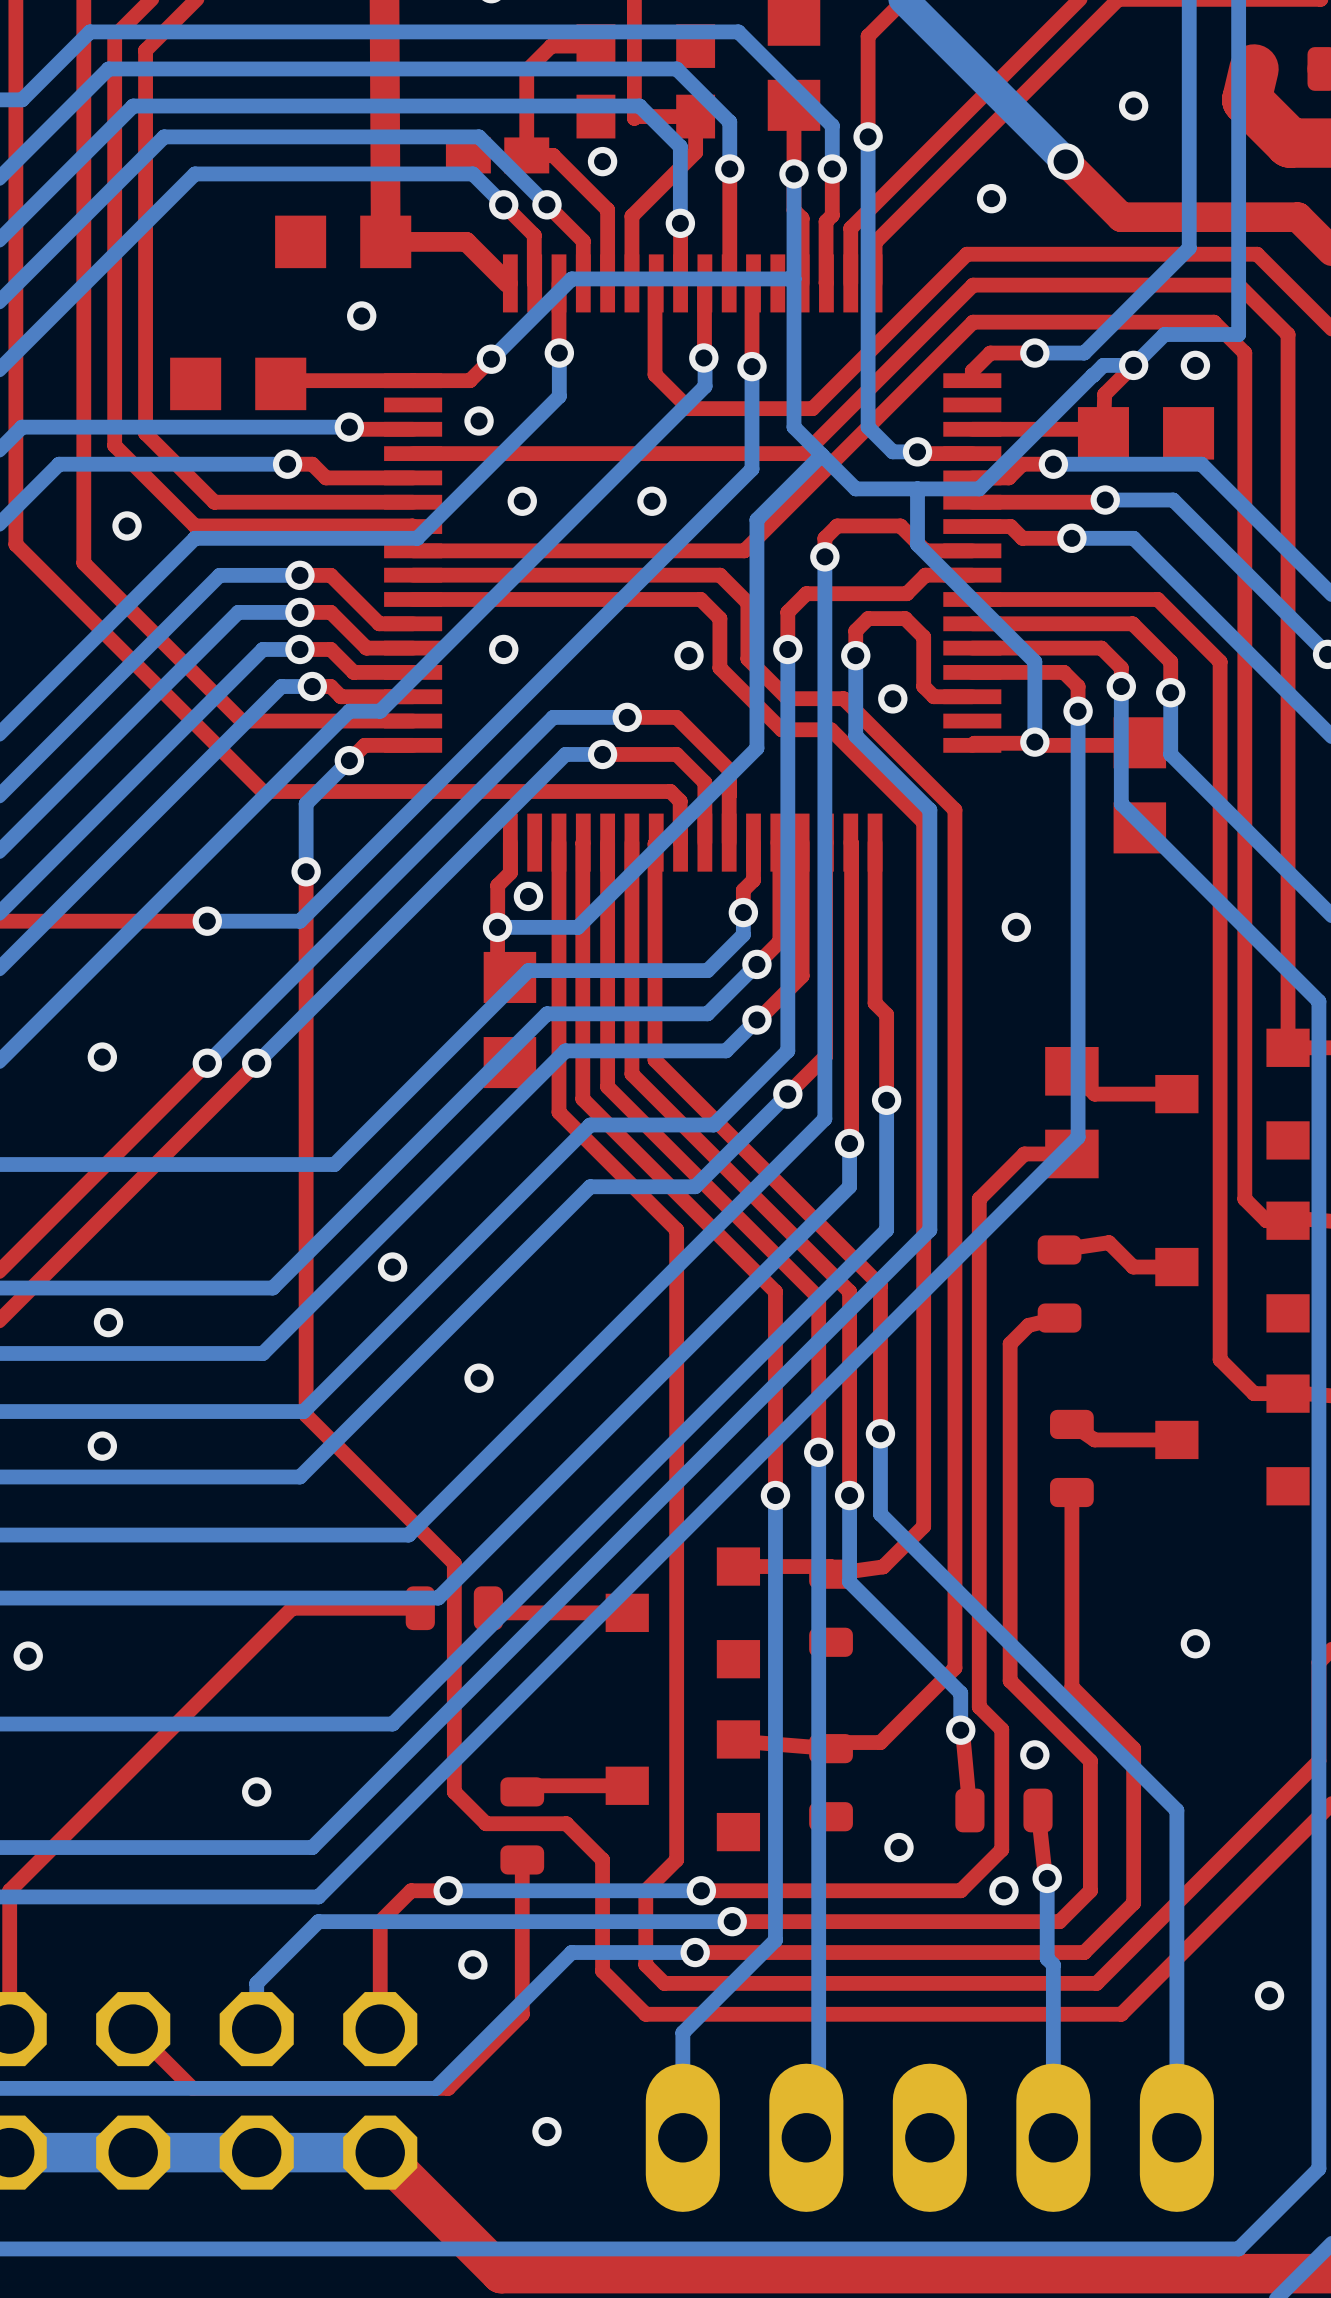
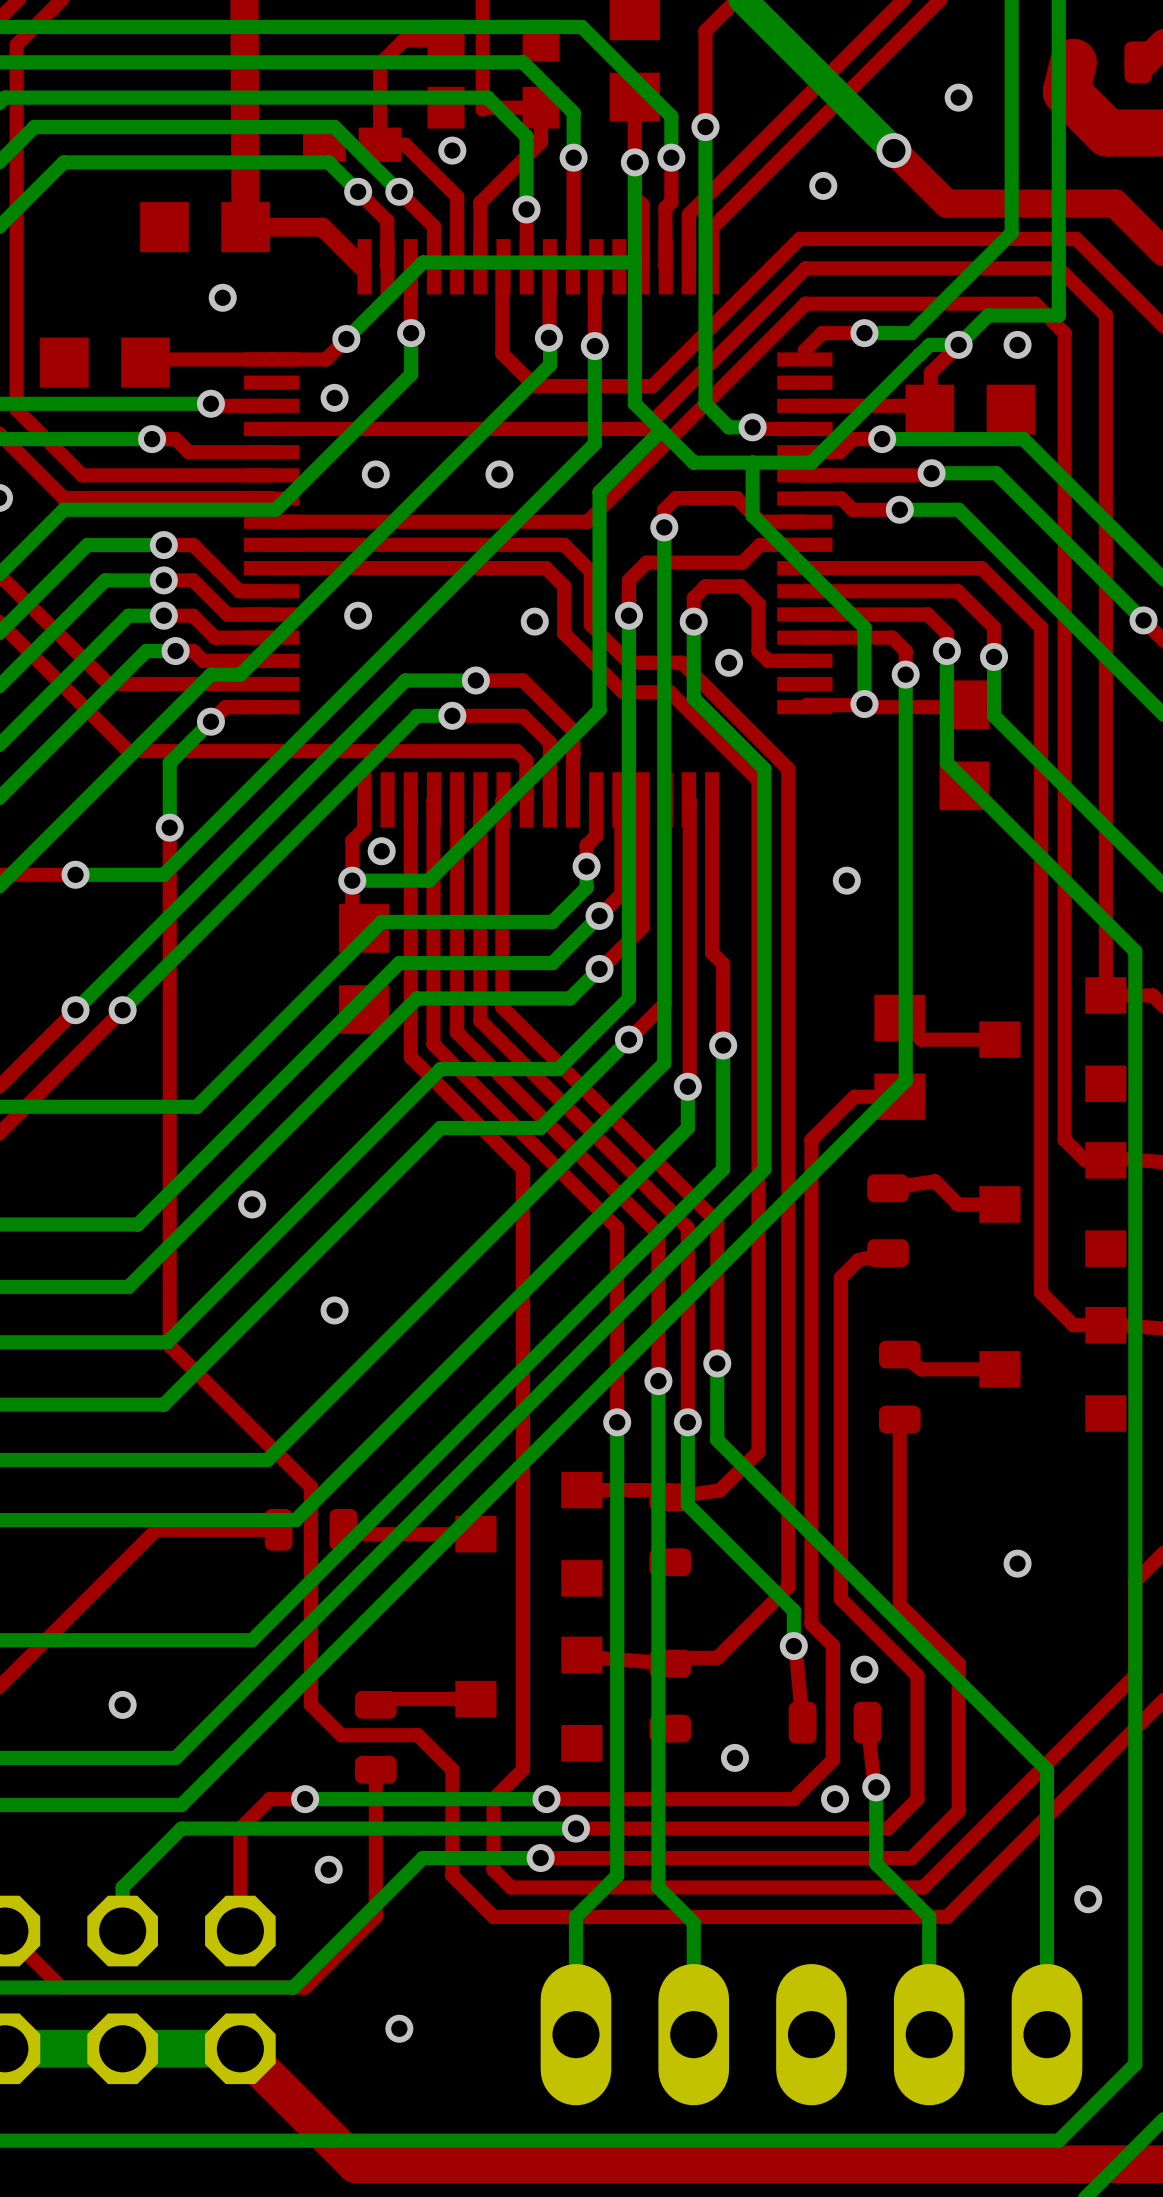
bottom track: (1176, 1810) (1176, 2137) -> (999, 1722) (1046, 1769) (1046, 2034)
bottom track: (775, 1940) (682, 2032) (682, 2137) -> (617, 1846) (617, 1875) (575, 1916) (575, 2034)
bottom track: (1053, 1964) (1053, 2137) -> (882, 1869) (929, 1916) (929, 2034)
bottom track: (818, 1983) (818, 2125) (806, 2137) -> (658, 1887) (693, 1922) (693, 2034)
part position: (929, 2137) -> (811, 2034)

